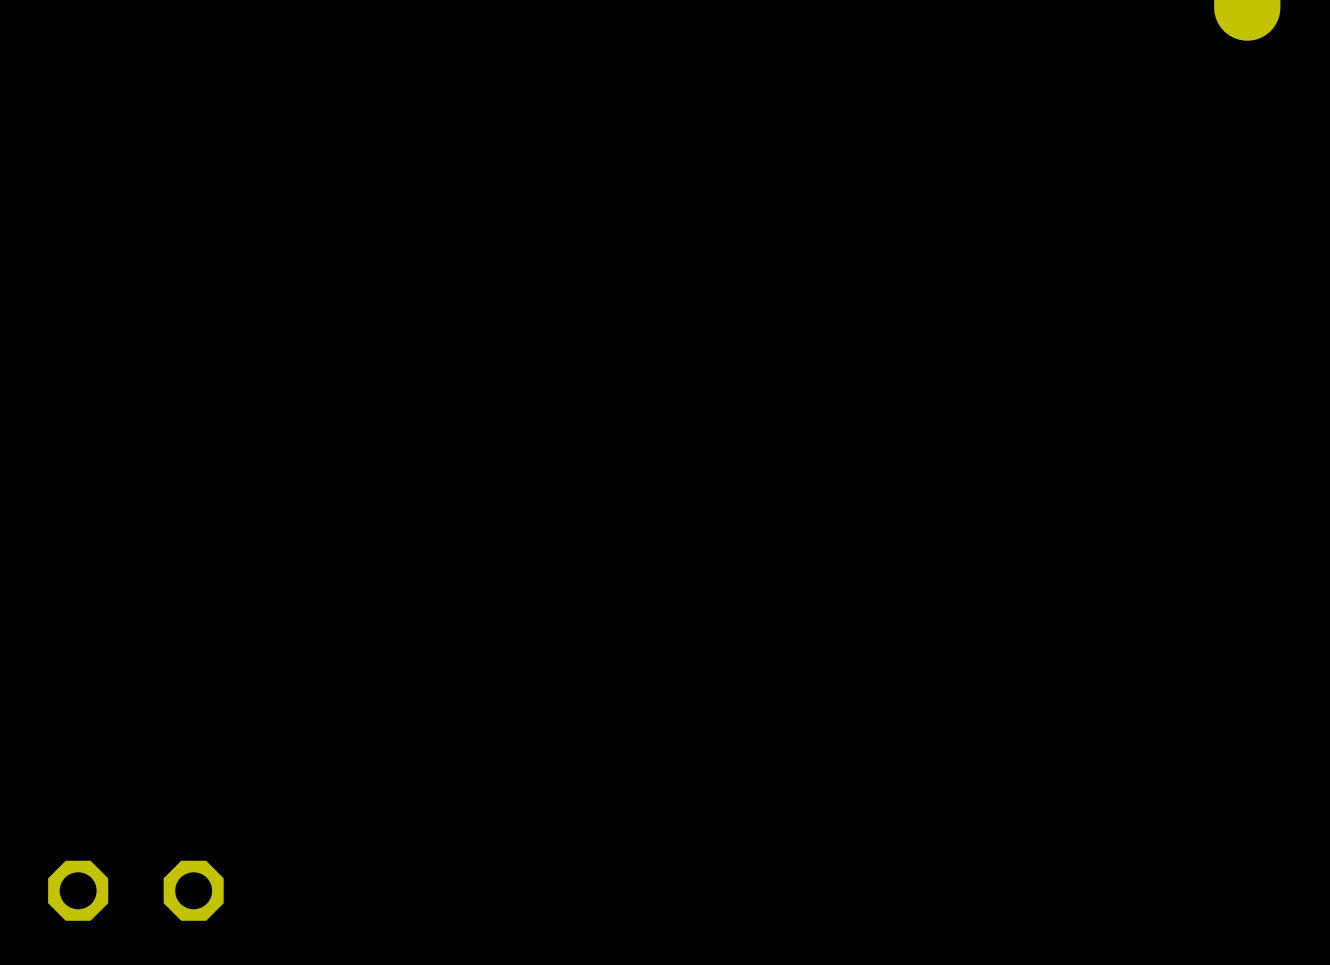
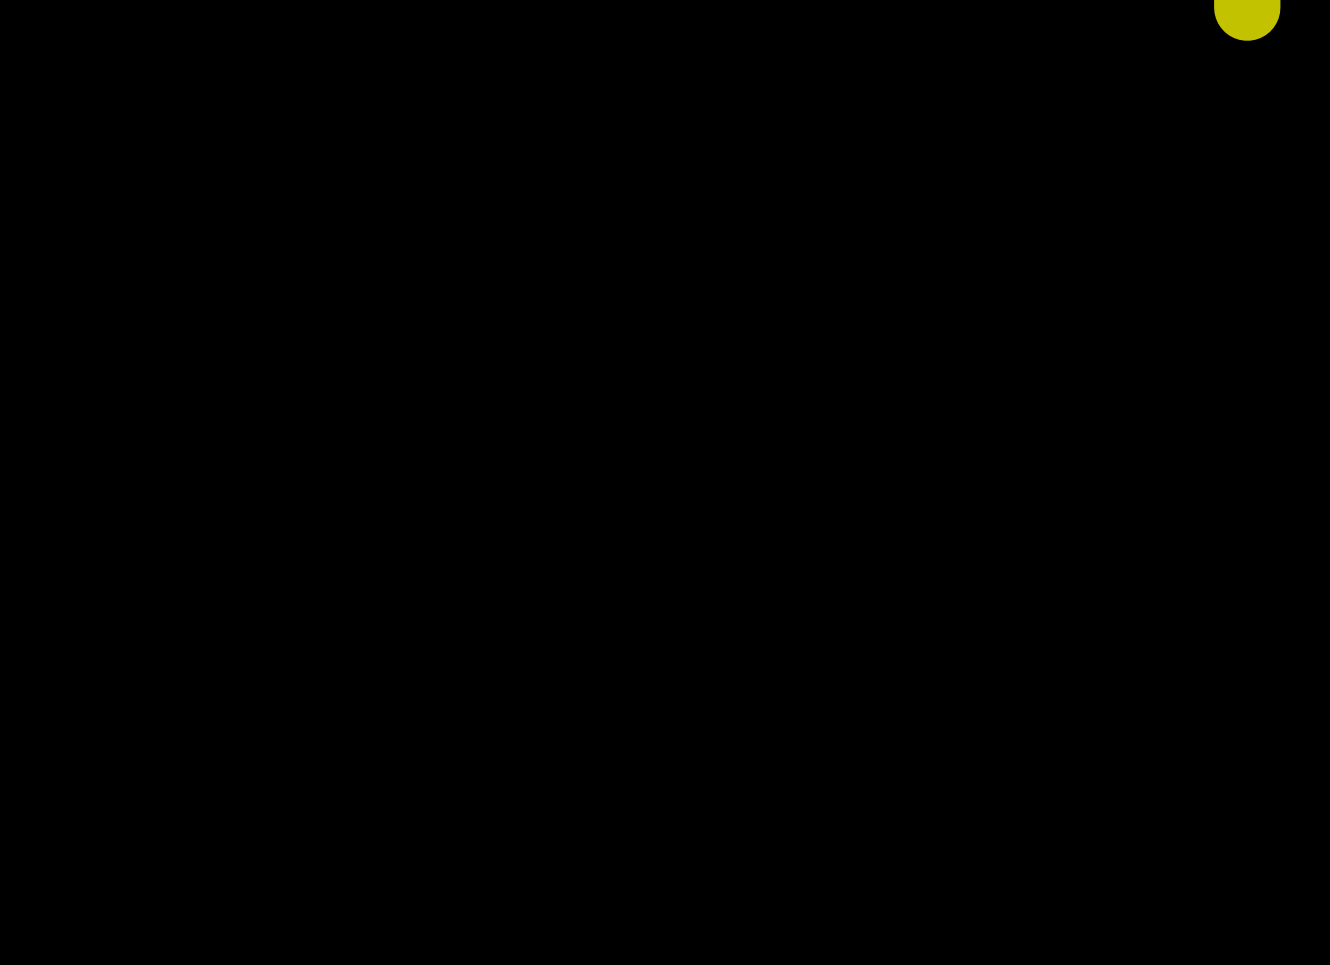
part: (135, 890) -> none

